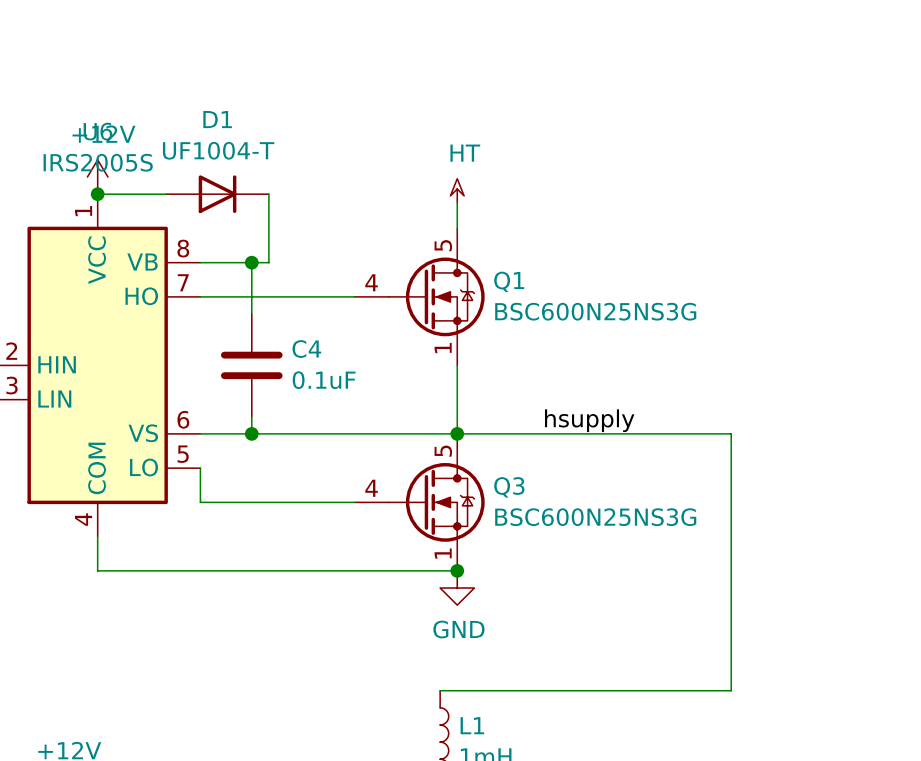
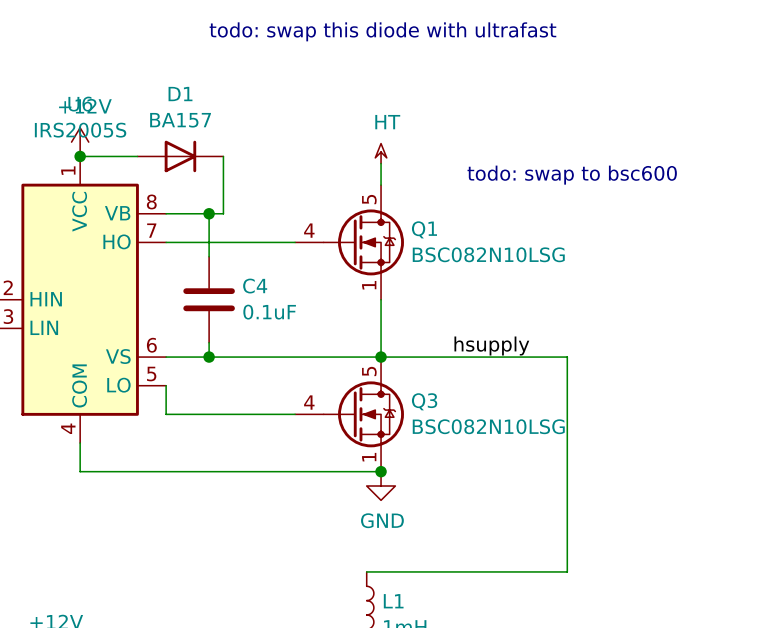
text: none -> todo: swap this diode with ultrafast (382, 31)
D1 value: UF1004-T (218, 150) -> BA157 (180, 120)
text: none -> todo: swap to bsc600 (572, 175)
Q1 value: BSC600N25NS3G (595, 311) -> BSC082N10LSG (488, 254)
wire: (679, 433) (731, 433) (731, 690) (679, 690) -> (567, 357) (567, 571)
Q3 value: BSC600N25NS3G (595, 517) -> BSC082N10LSG (488, 426)

